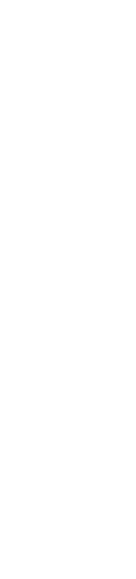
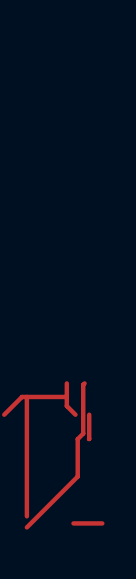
track: none -> (66, 383) (66, 406) (75, 414)
track: none -> (84, 383) (83, 433) (77, 439) (77, 476) (26, 527)
track: none -> (26, 396) (26, 516)
track: none -> (66, 396) (21, 396) (4, 414)
track: none -> (89, 414) (89, 439)
track: none -> (73, 523) (102, 523)

